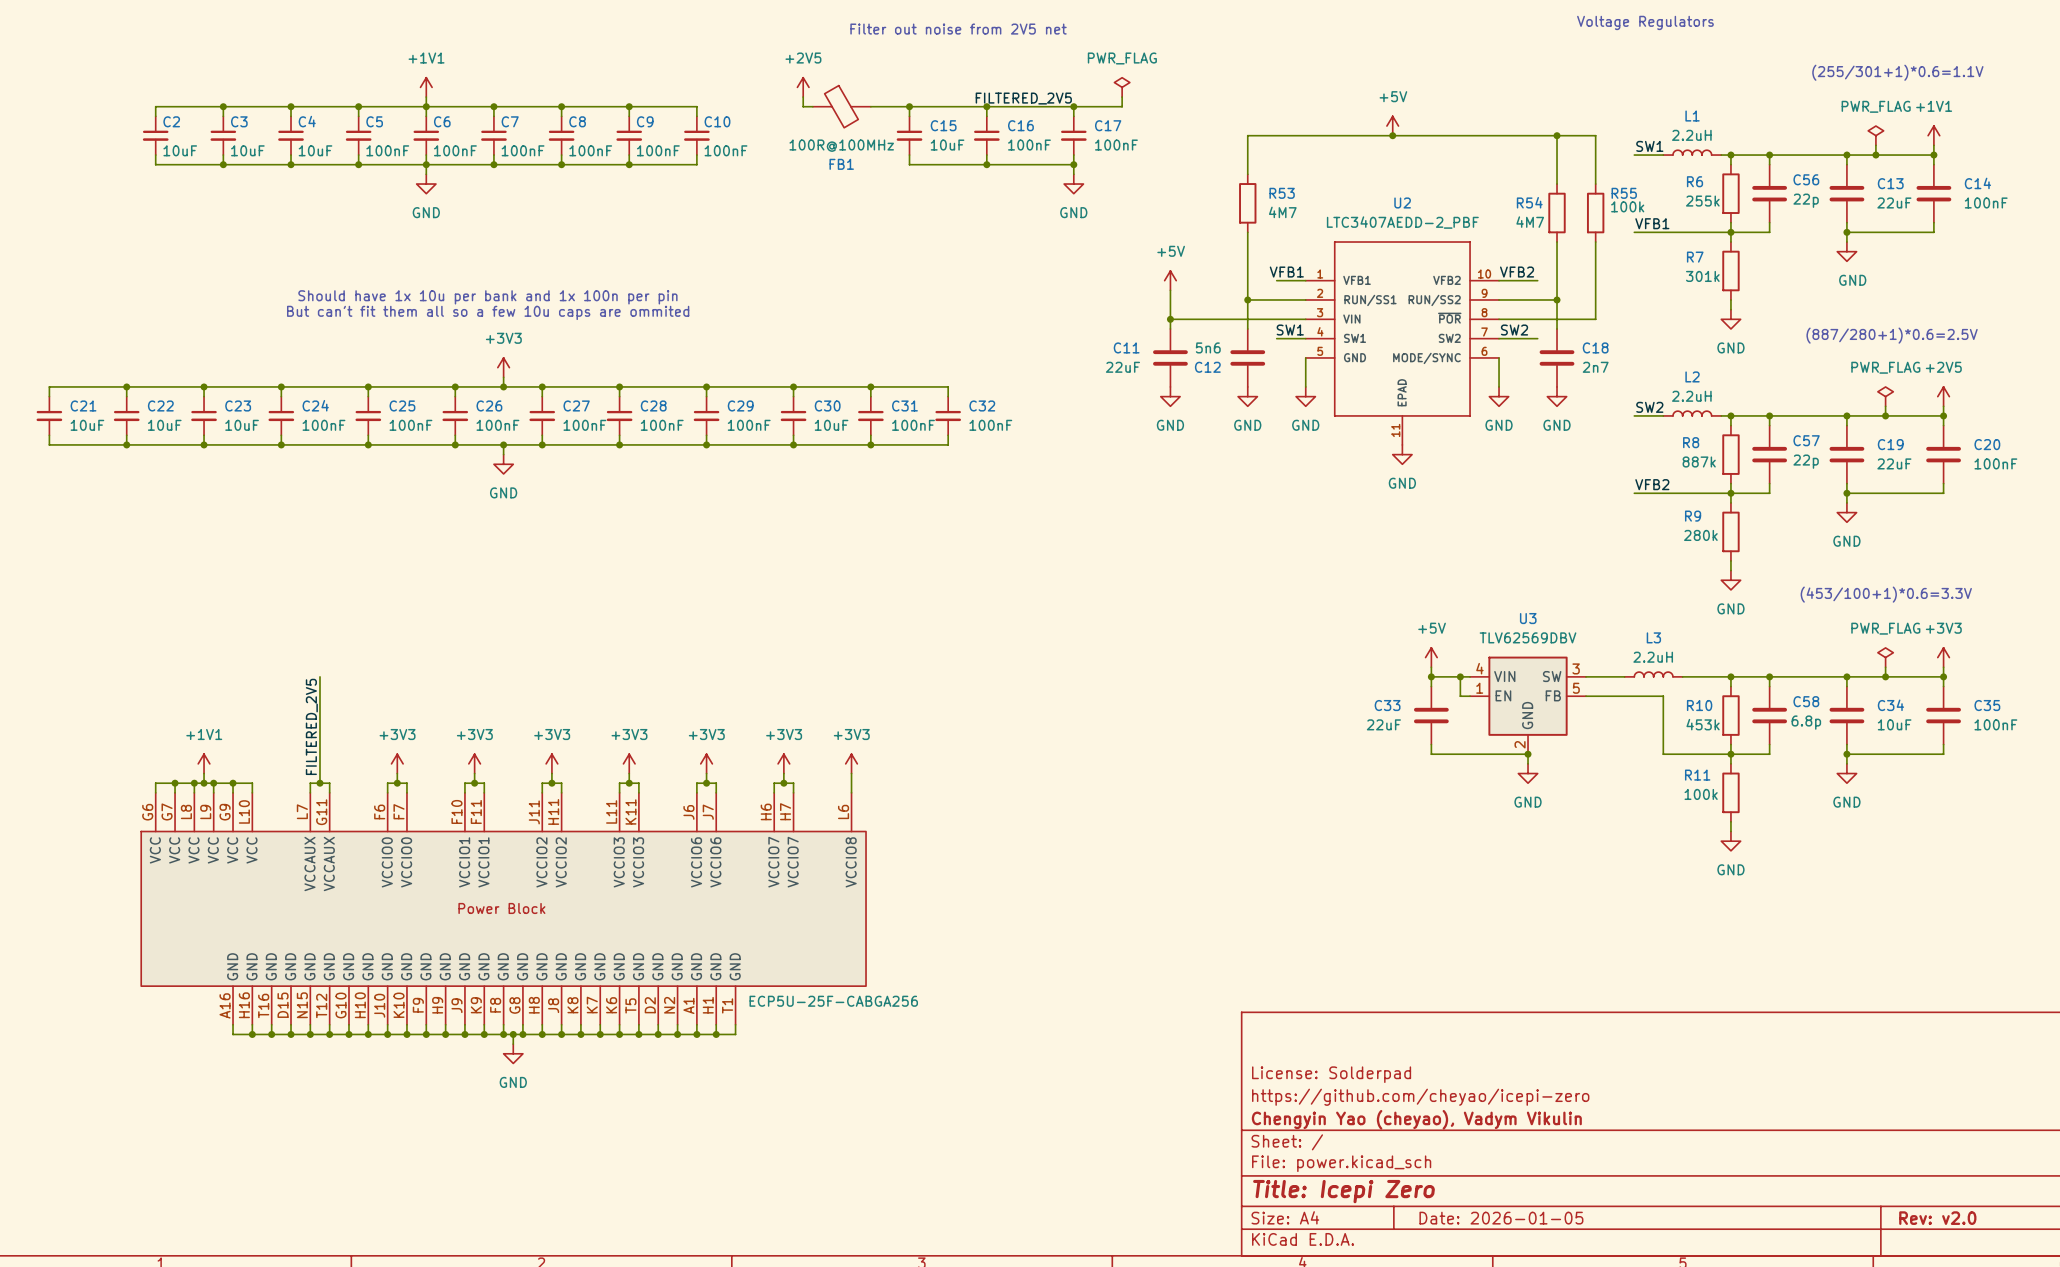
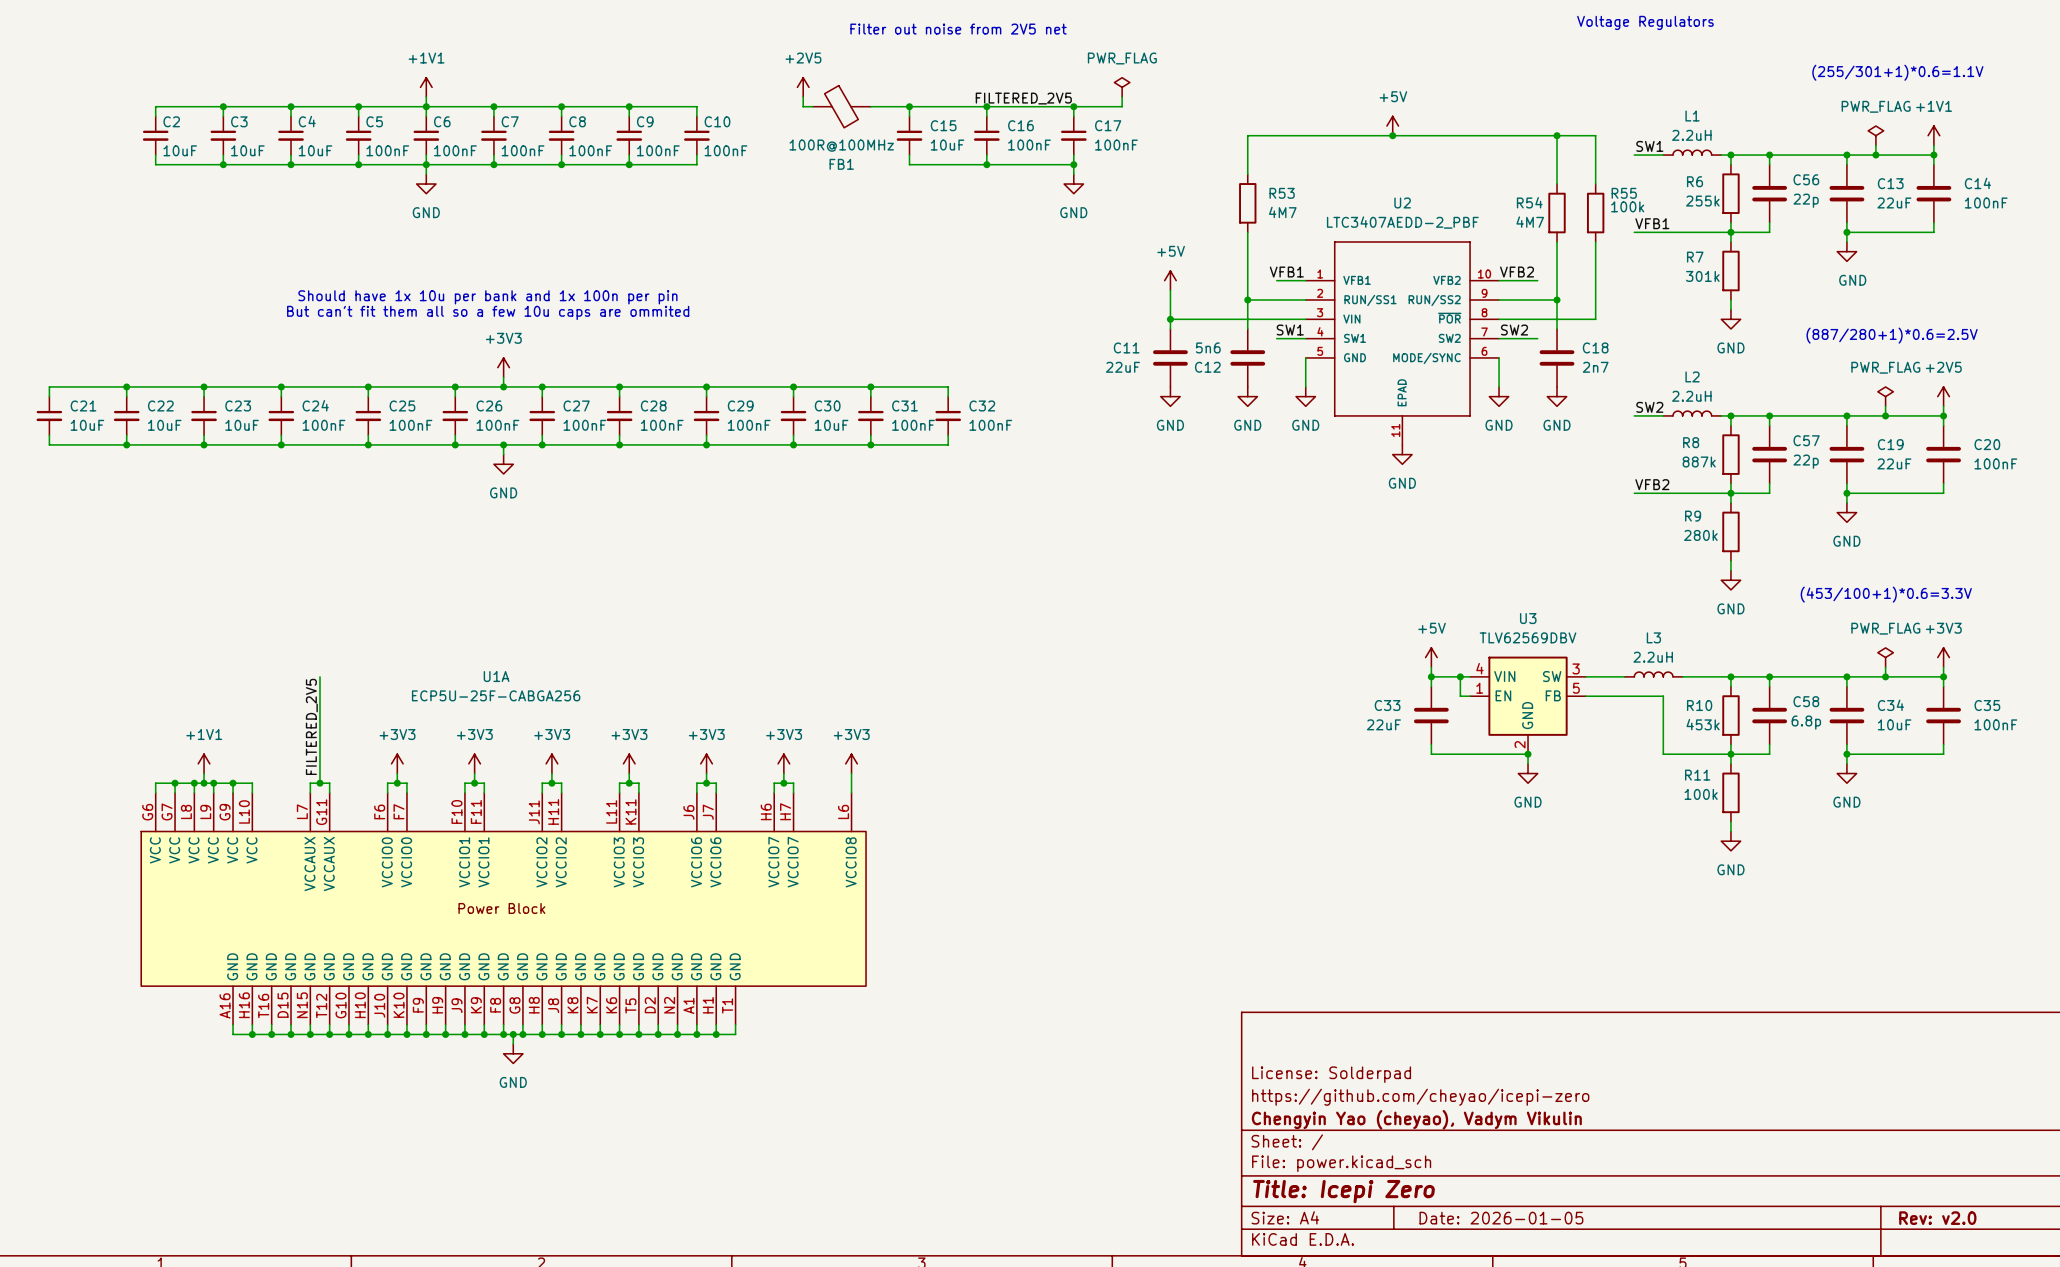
U1A name: none -> U1A (496, 676)
U1A value position: ECP5U-25F-CABGA256 (833, 1001) -> ECP5U-25F-CABGA256 (496, 695)

